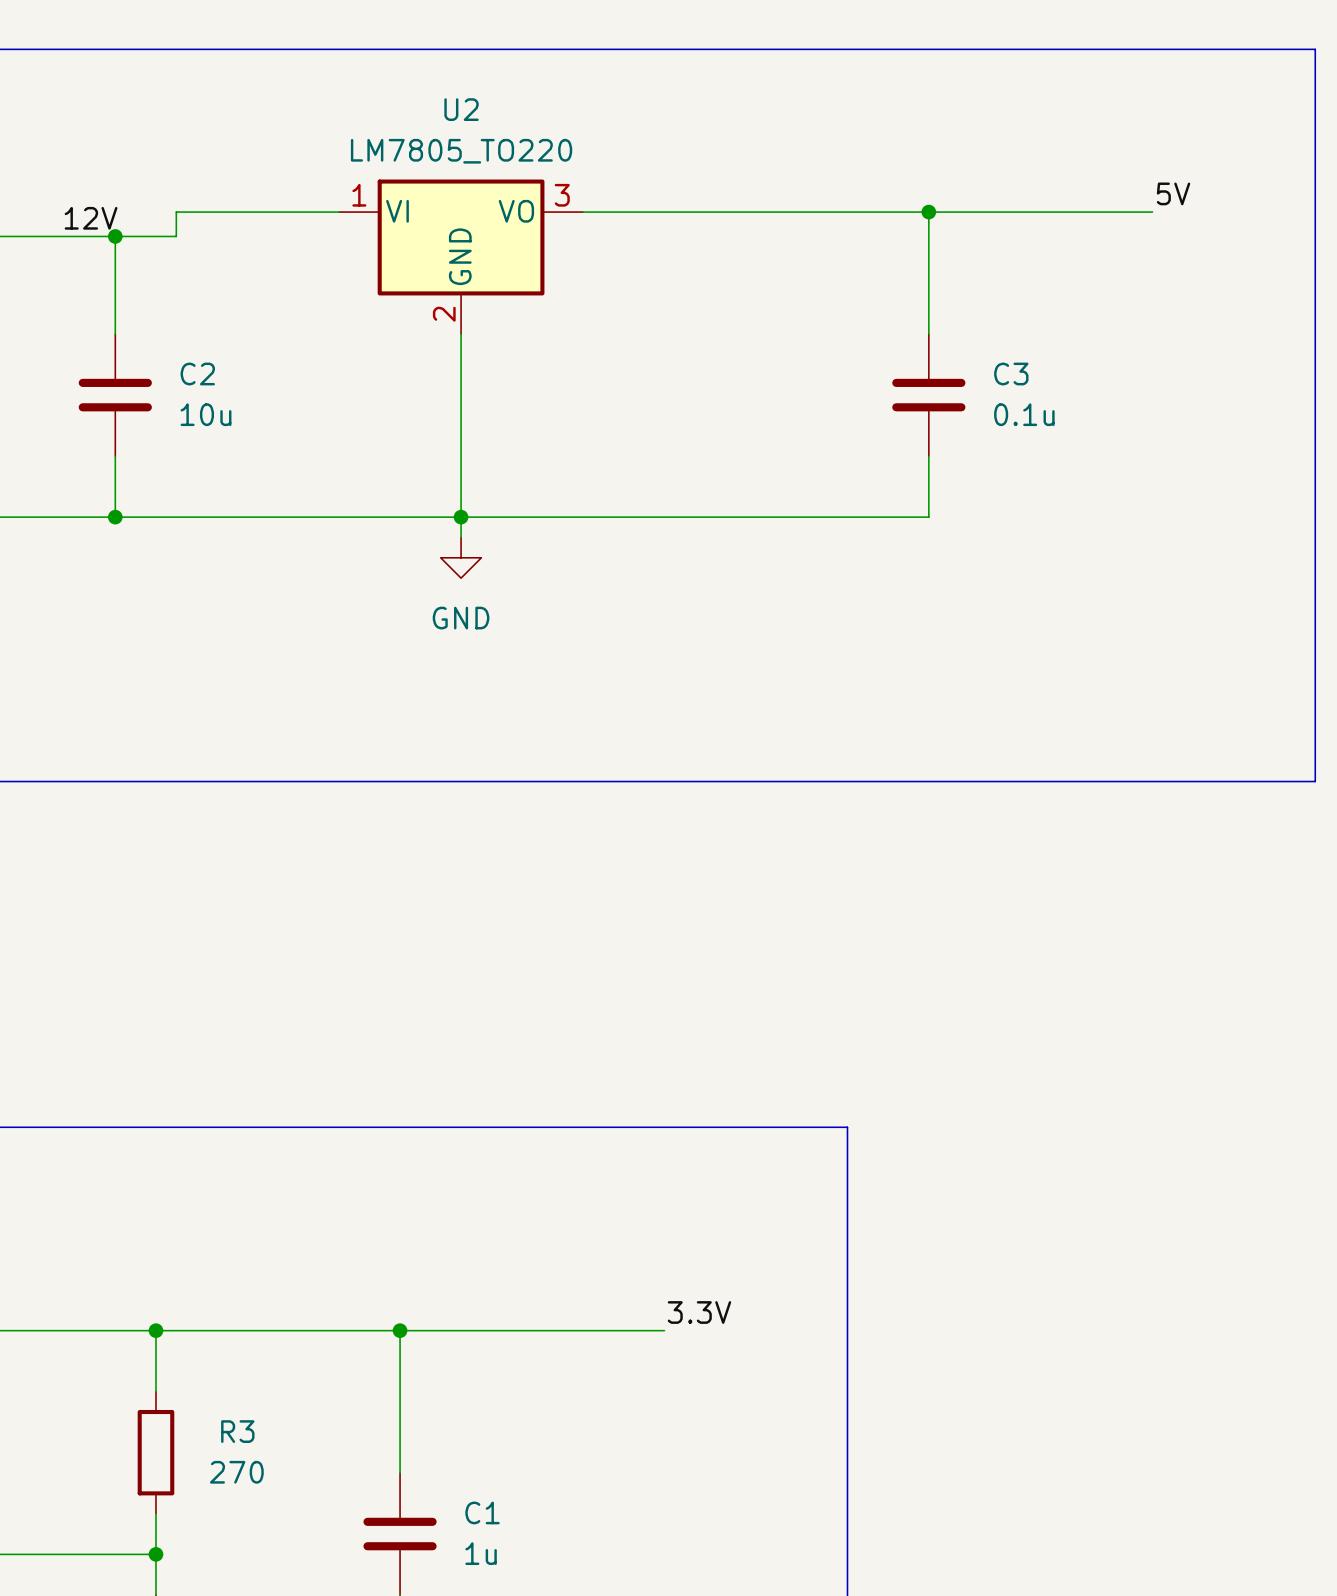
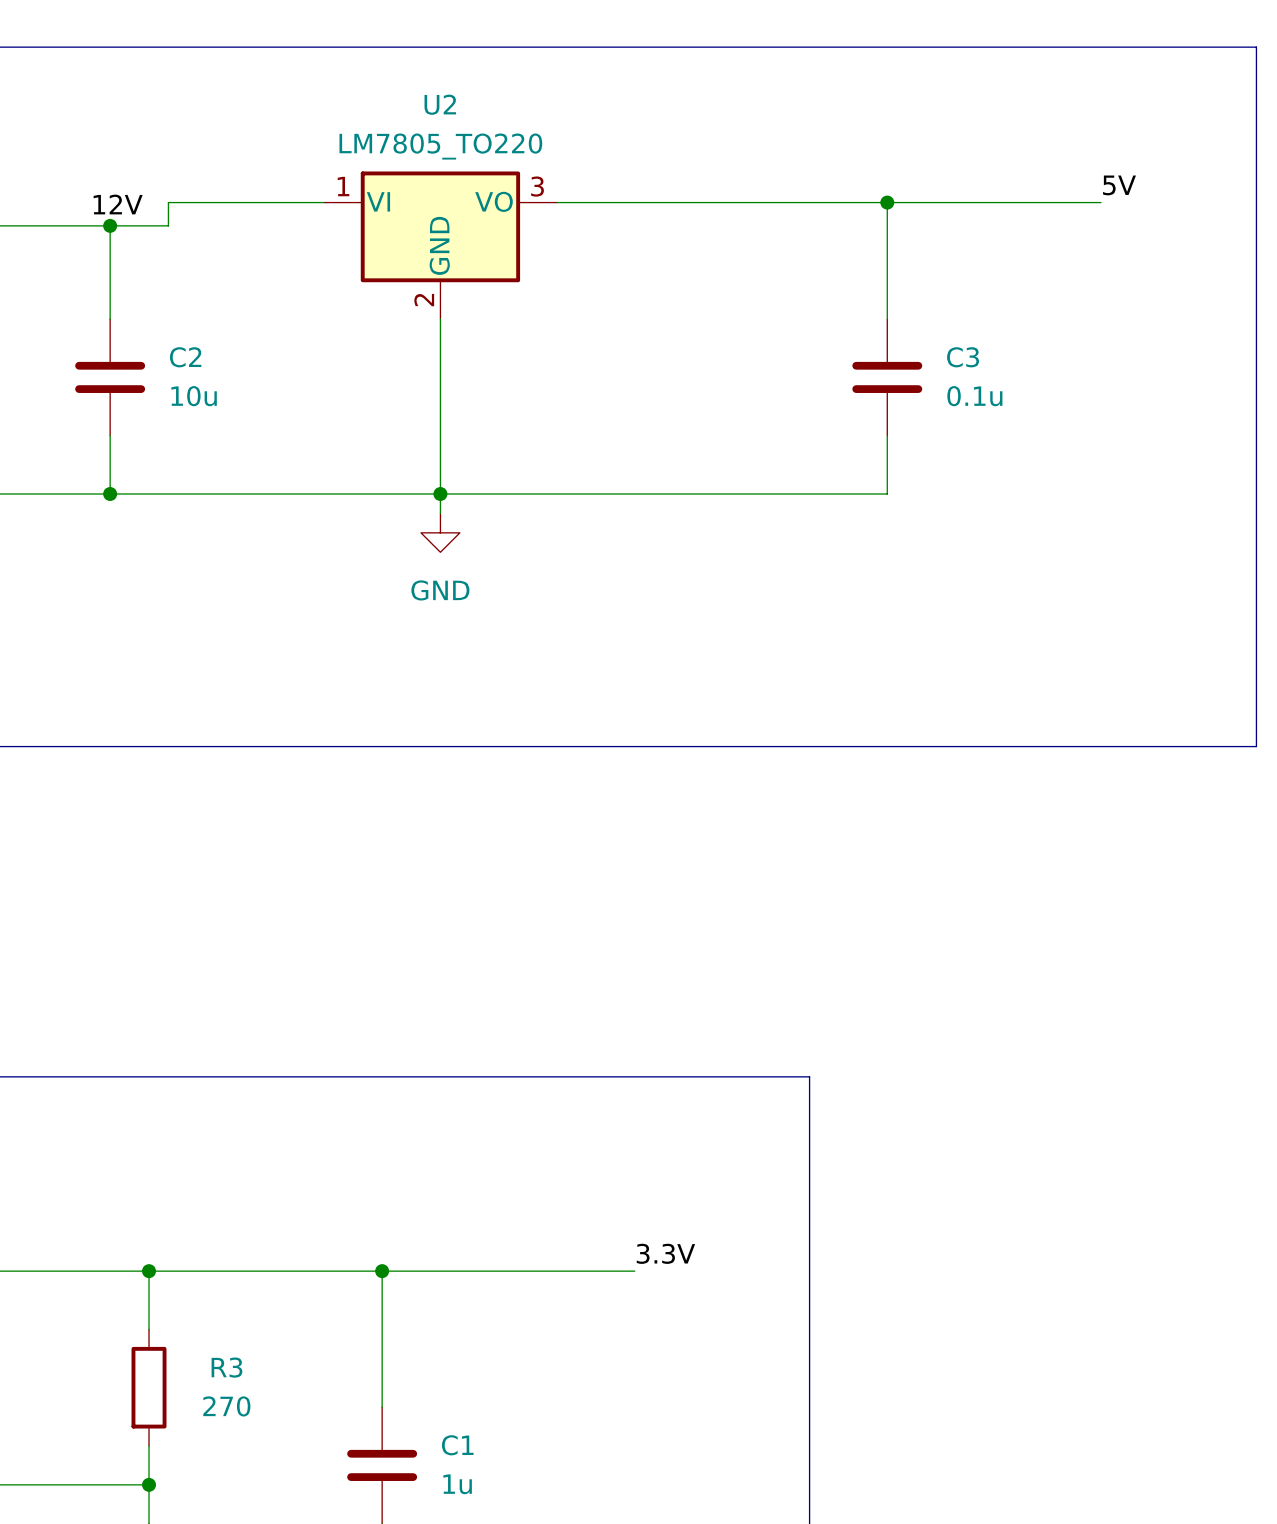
label position: 12V (91, 218) -> 12V (118, 204)

